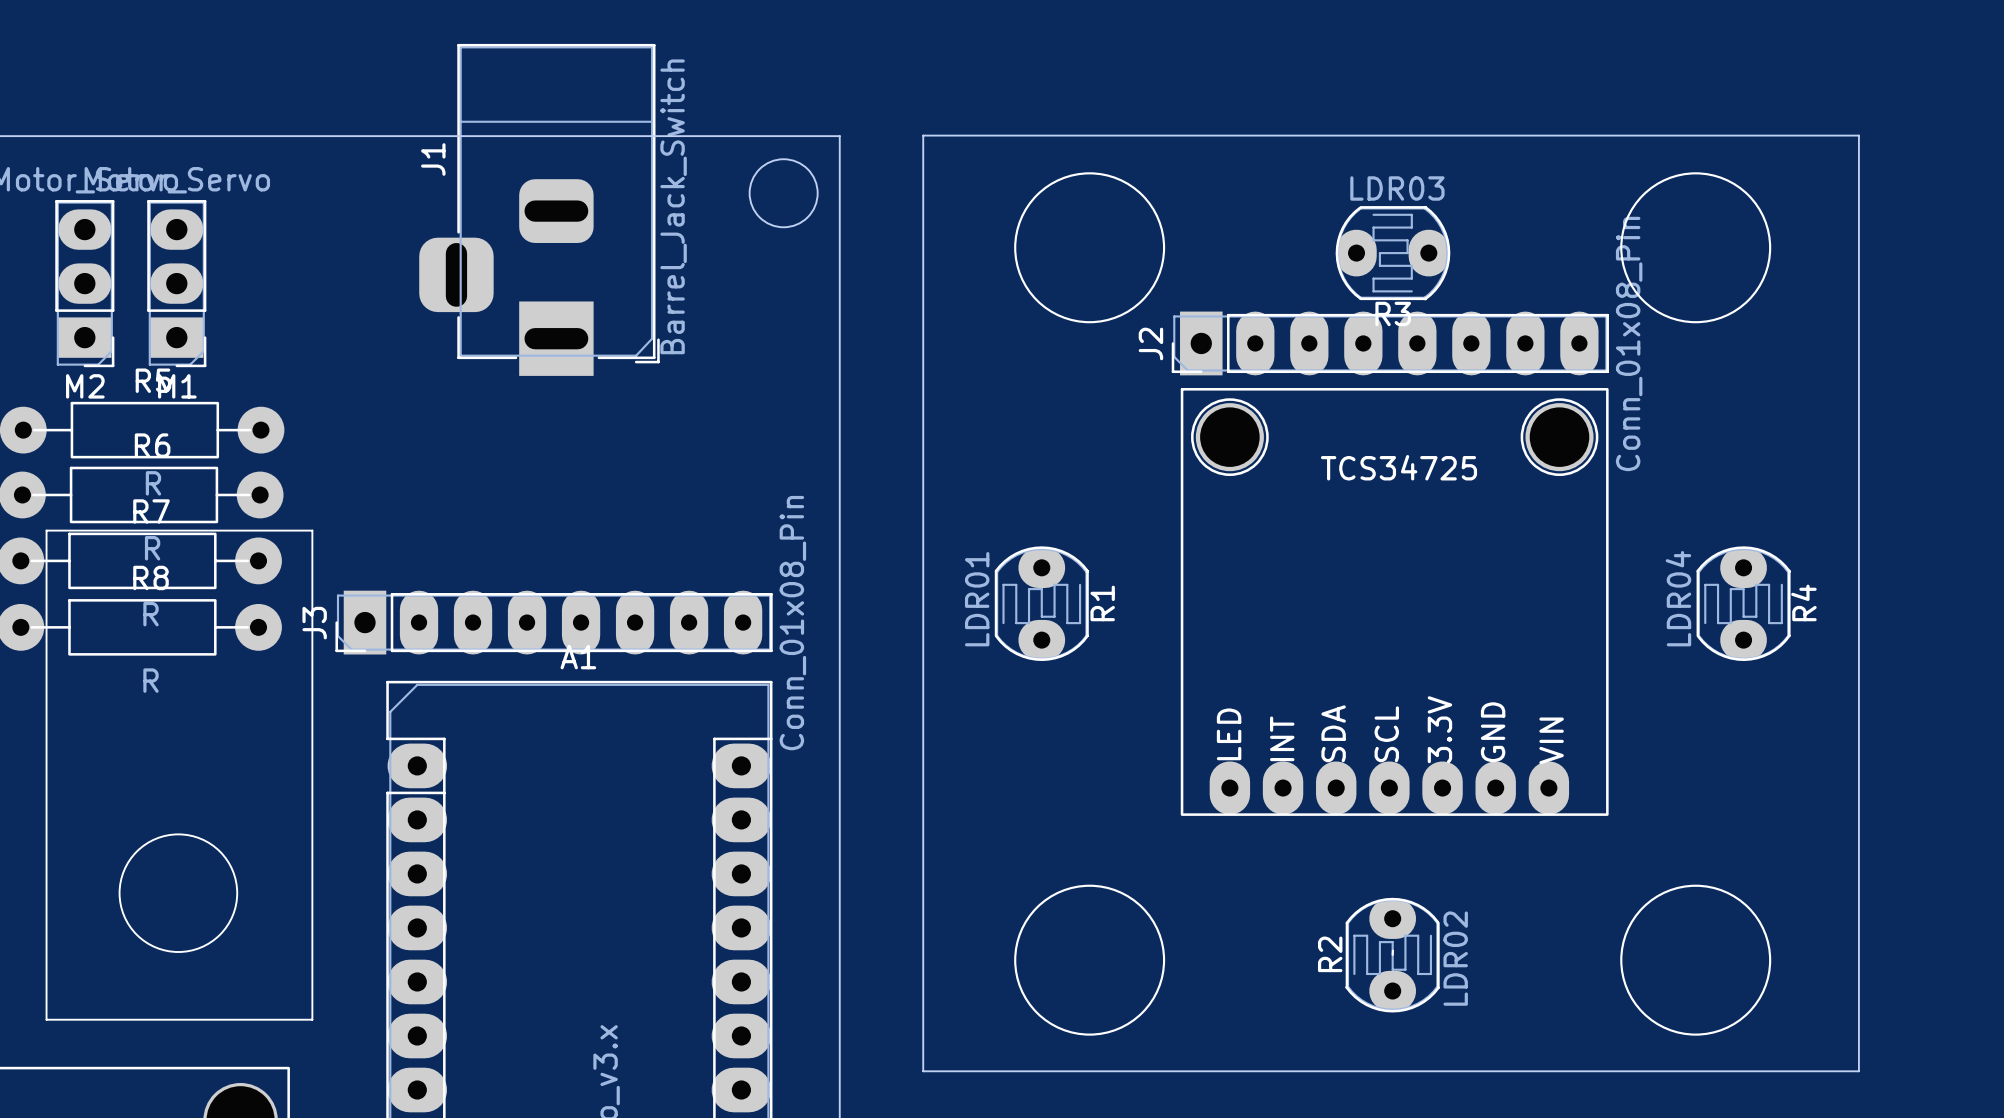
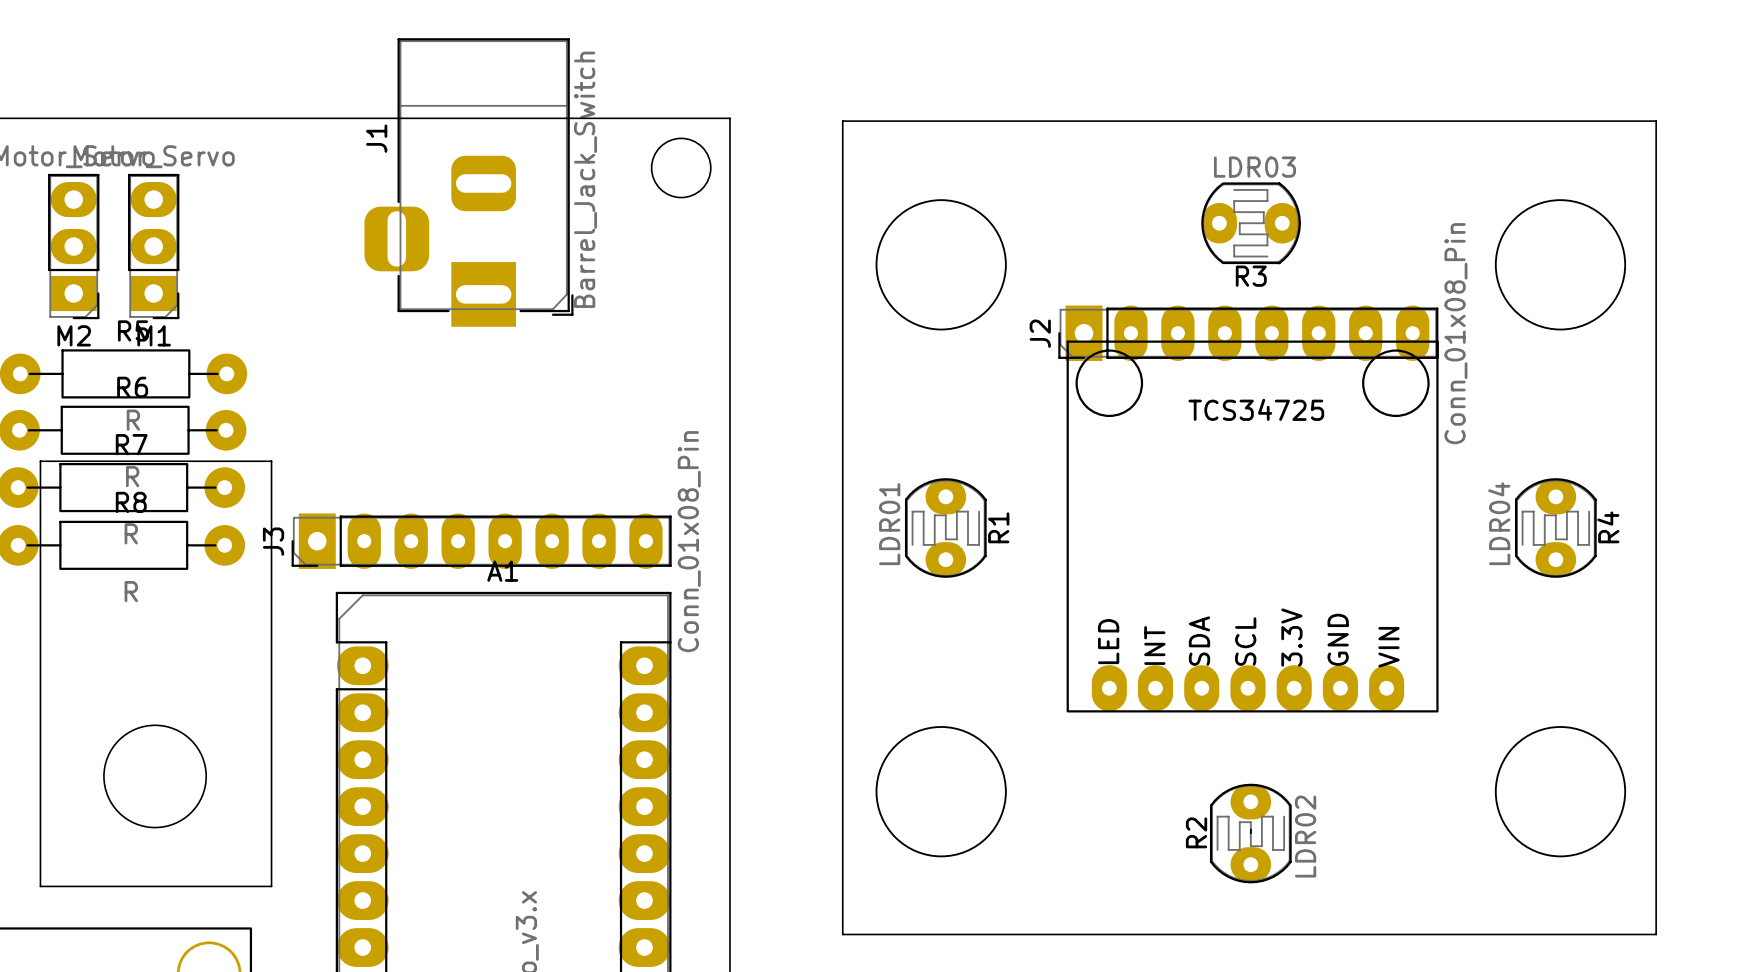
board edge: (923, 135) (1858, 135) (1858, 1071) (923, 1071) (923, 135) -> (842, 121) (1656, 121) (1656, 934) (842, 934) (842, 121)
drawing position: (1089, 247) -> (941, 264)
drawing position: (1695, 247) -> (1560, 264)
R3 position: (1392, 253) -> (1251, 223)
J2 position: (1390, 343) -> (1248, 333)
TCS34725 footprint: [1180, 388, 1609, 816] -> [1066, 340, 1439, 713]
R1 position: (1041, 603) -> (945, 527)
R4 position: (1743, 603) -> (1556, 527)
line: (1392, 950) (1392, 954) -> (1251, 829) (1250, 833)
R2 position: (1392, 955) -> (1250, 833)
drawing position: (1089, 960) -> (941, 791)
drawing position: (1695, 960) -> (1560, 791)

